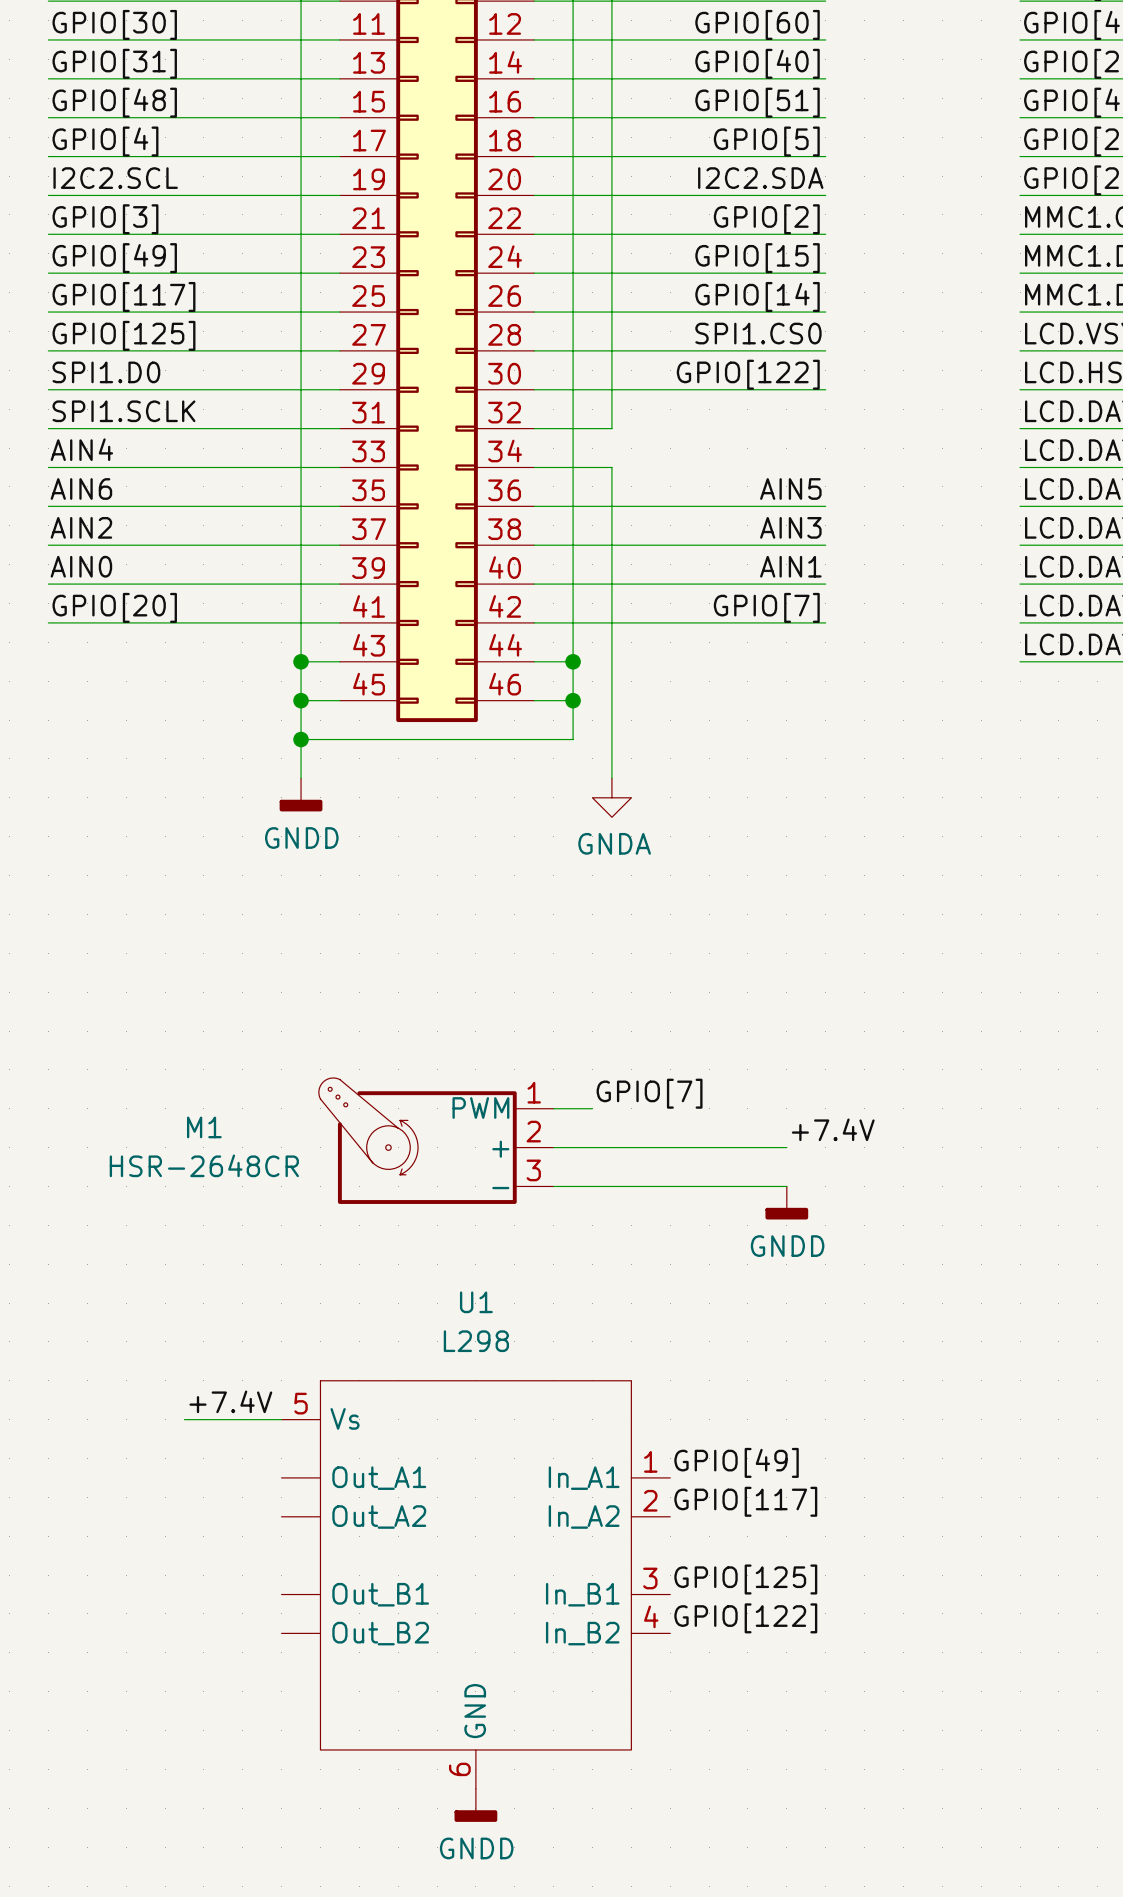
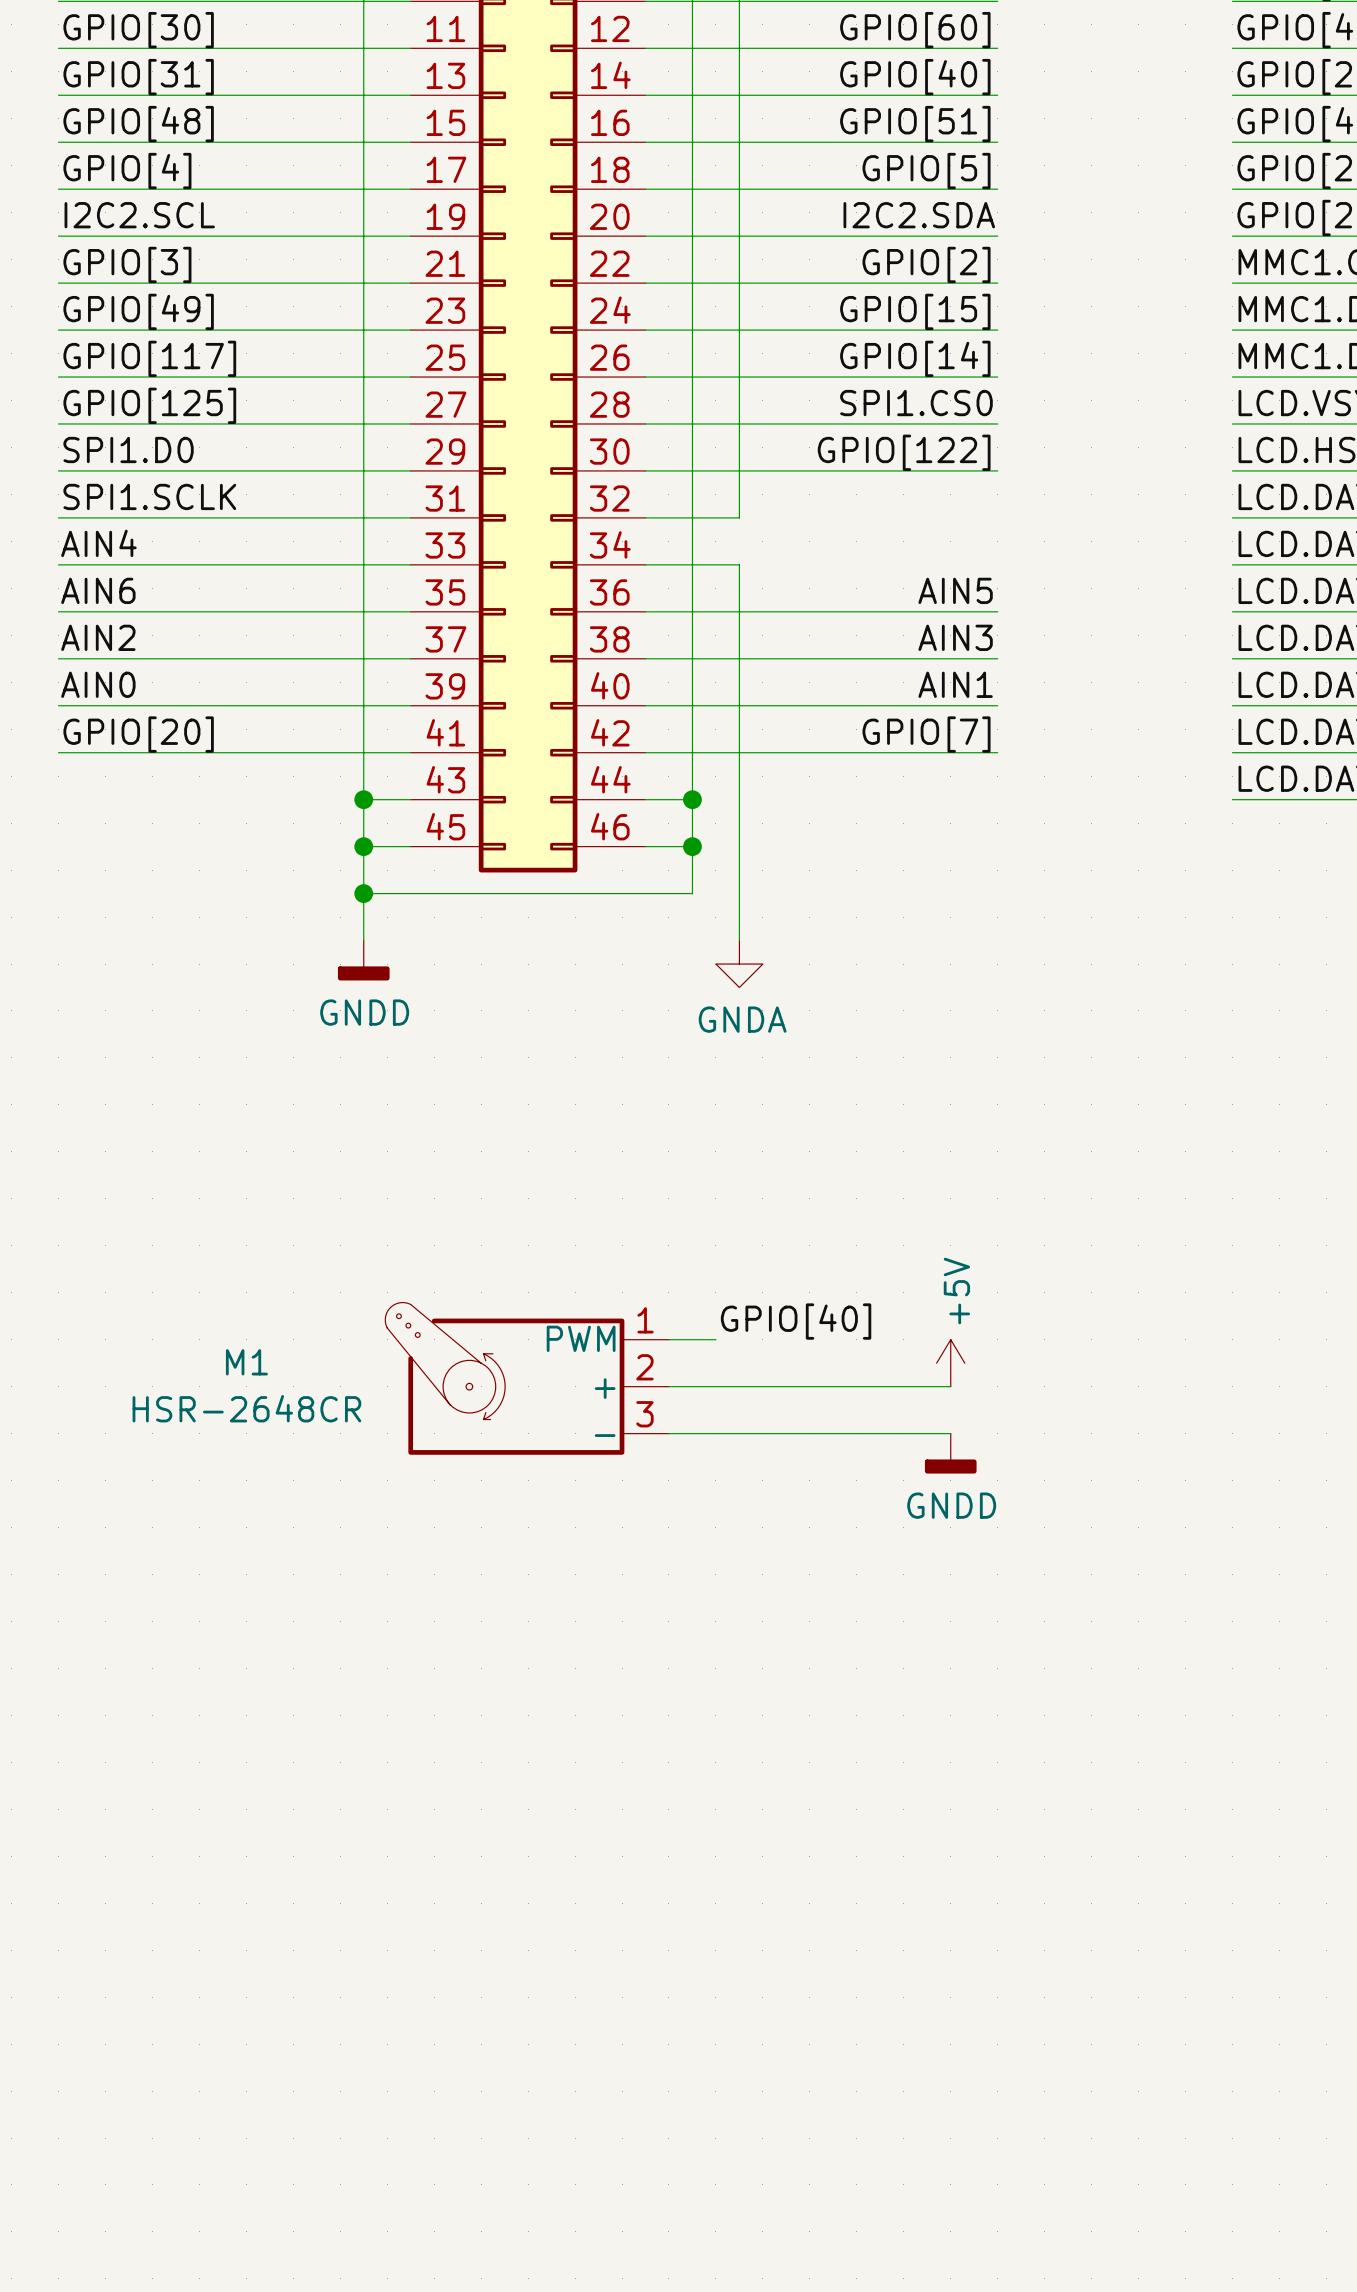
label: GPIO[7] (649, 1093) -> GPIO[40] (796, 1321)
power symbol: none -> +5V (950, 1363)
label: +7.4V (833, 1129) -> none
label: +7.4V (230, 1401) -> none
wire: (184, 1419) (281, 1419) -> none
label: GPIO[49] (736, 1462) -> none
label: GPIO[117] (745, 1501) -> none
label: GPIO[125] (745, 1579) -> none
U1: L298 (475, 1584) -> none
label: GPIO[122] (745, 1618) -> none
power symbol: GNDD (475, 1805) -> none

